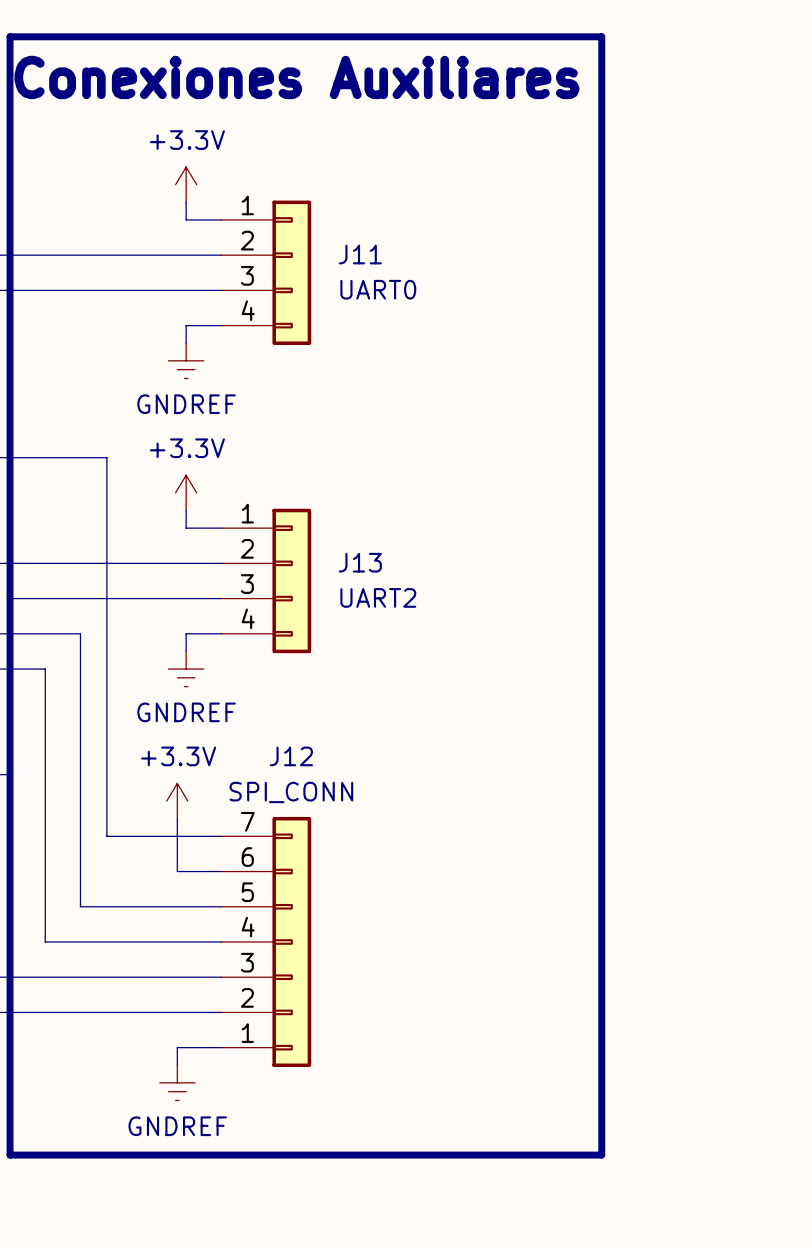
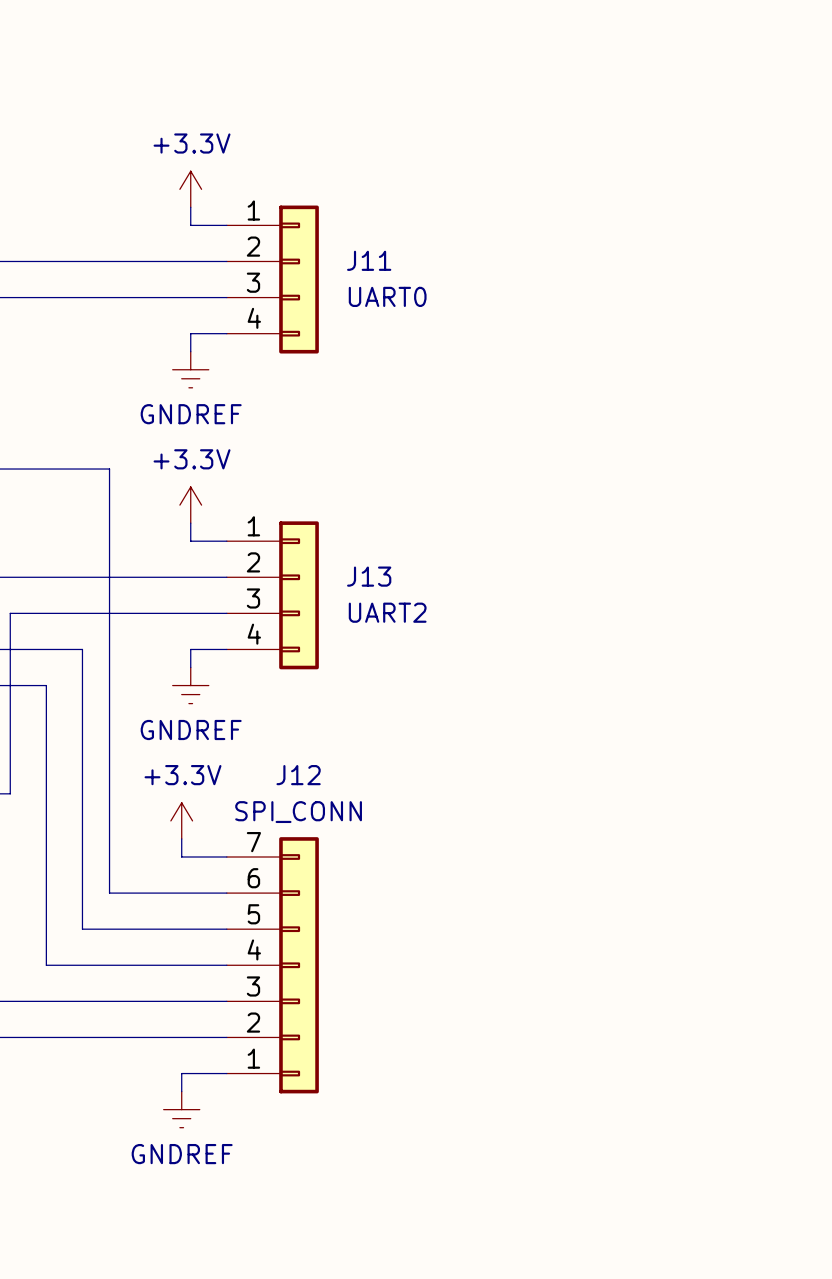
line: (10, 36) (601, 36) (601, 1155) (10, 1155) (10, 36) -> none
text: Conexiones Auxiliares (296, 77) -> none
wire: (106, 836) (177, 836) (177, 871) -> (109, 856) (109, 893) (181, 893)

